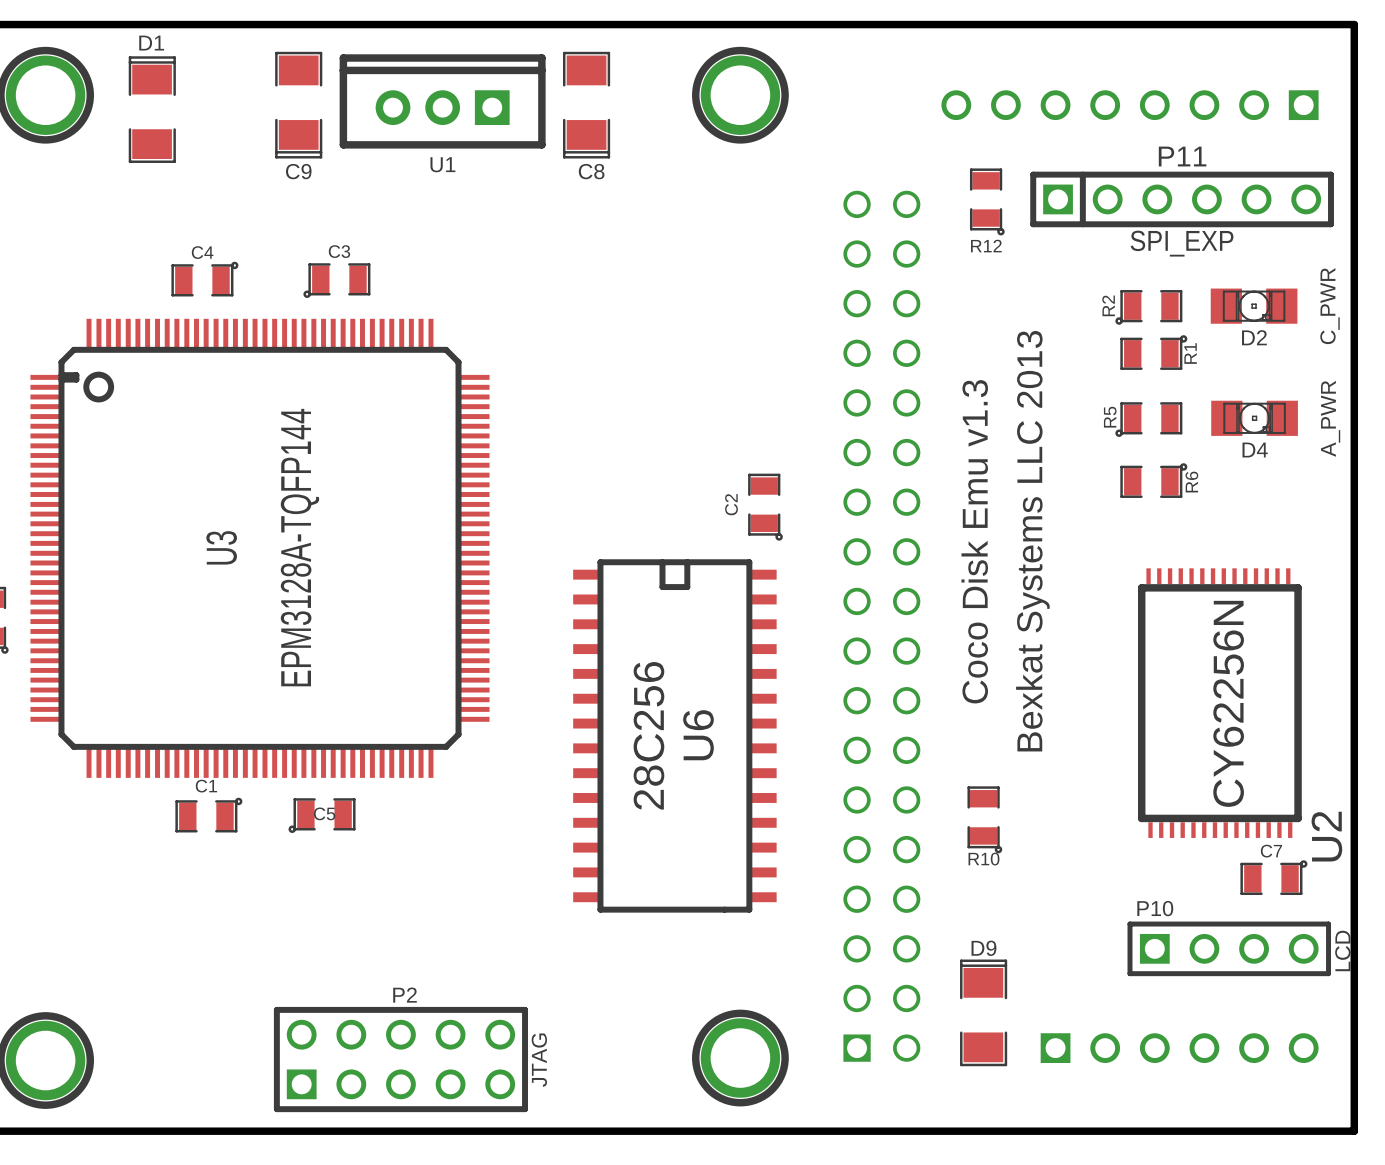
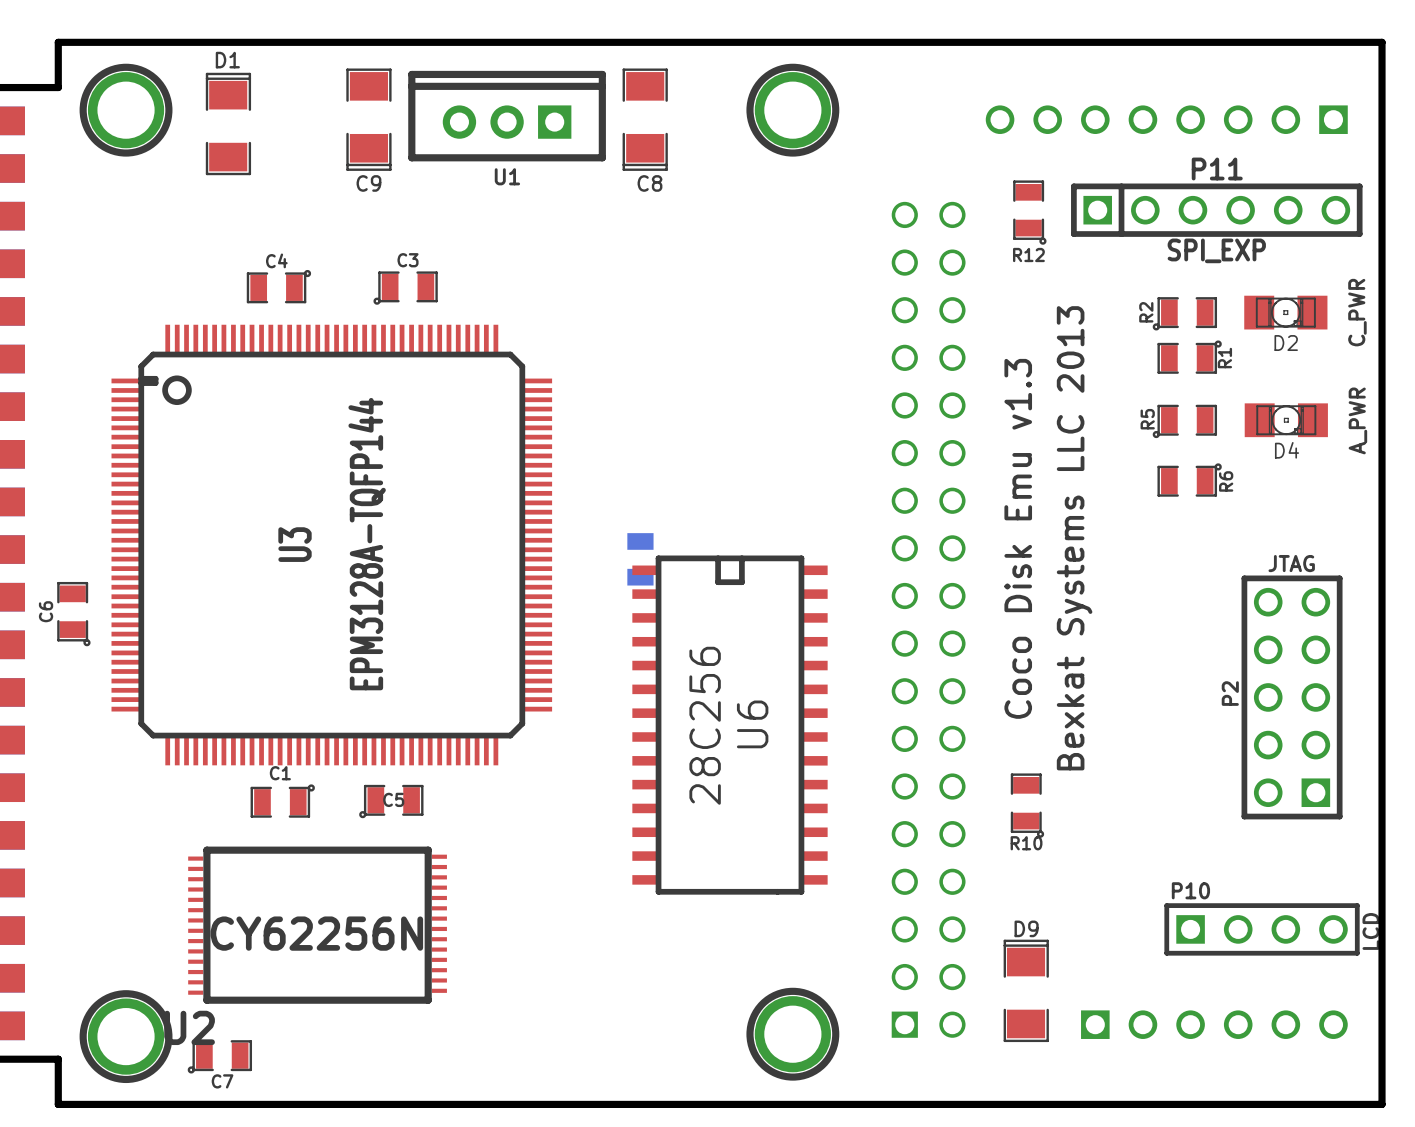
C2 side: top (765, 507) -> bottom (640, 559)
U2 rotation: 0° (1219, 703) -> 90° clockwise (317, 925)
U2 position: (1219, 703) -> (317, 925)
C7 rotation: 0° (1273, 877) -> 180° (219, 1056)
C7 position: (1273, 877) -> (219, 1056)
P2 rotation: 0° (400, 1059) -> 90° counterclockwise (1292, 697)
P2 position: (400, 1059) -> (1292, 697)

